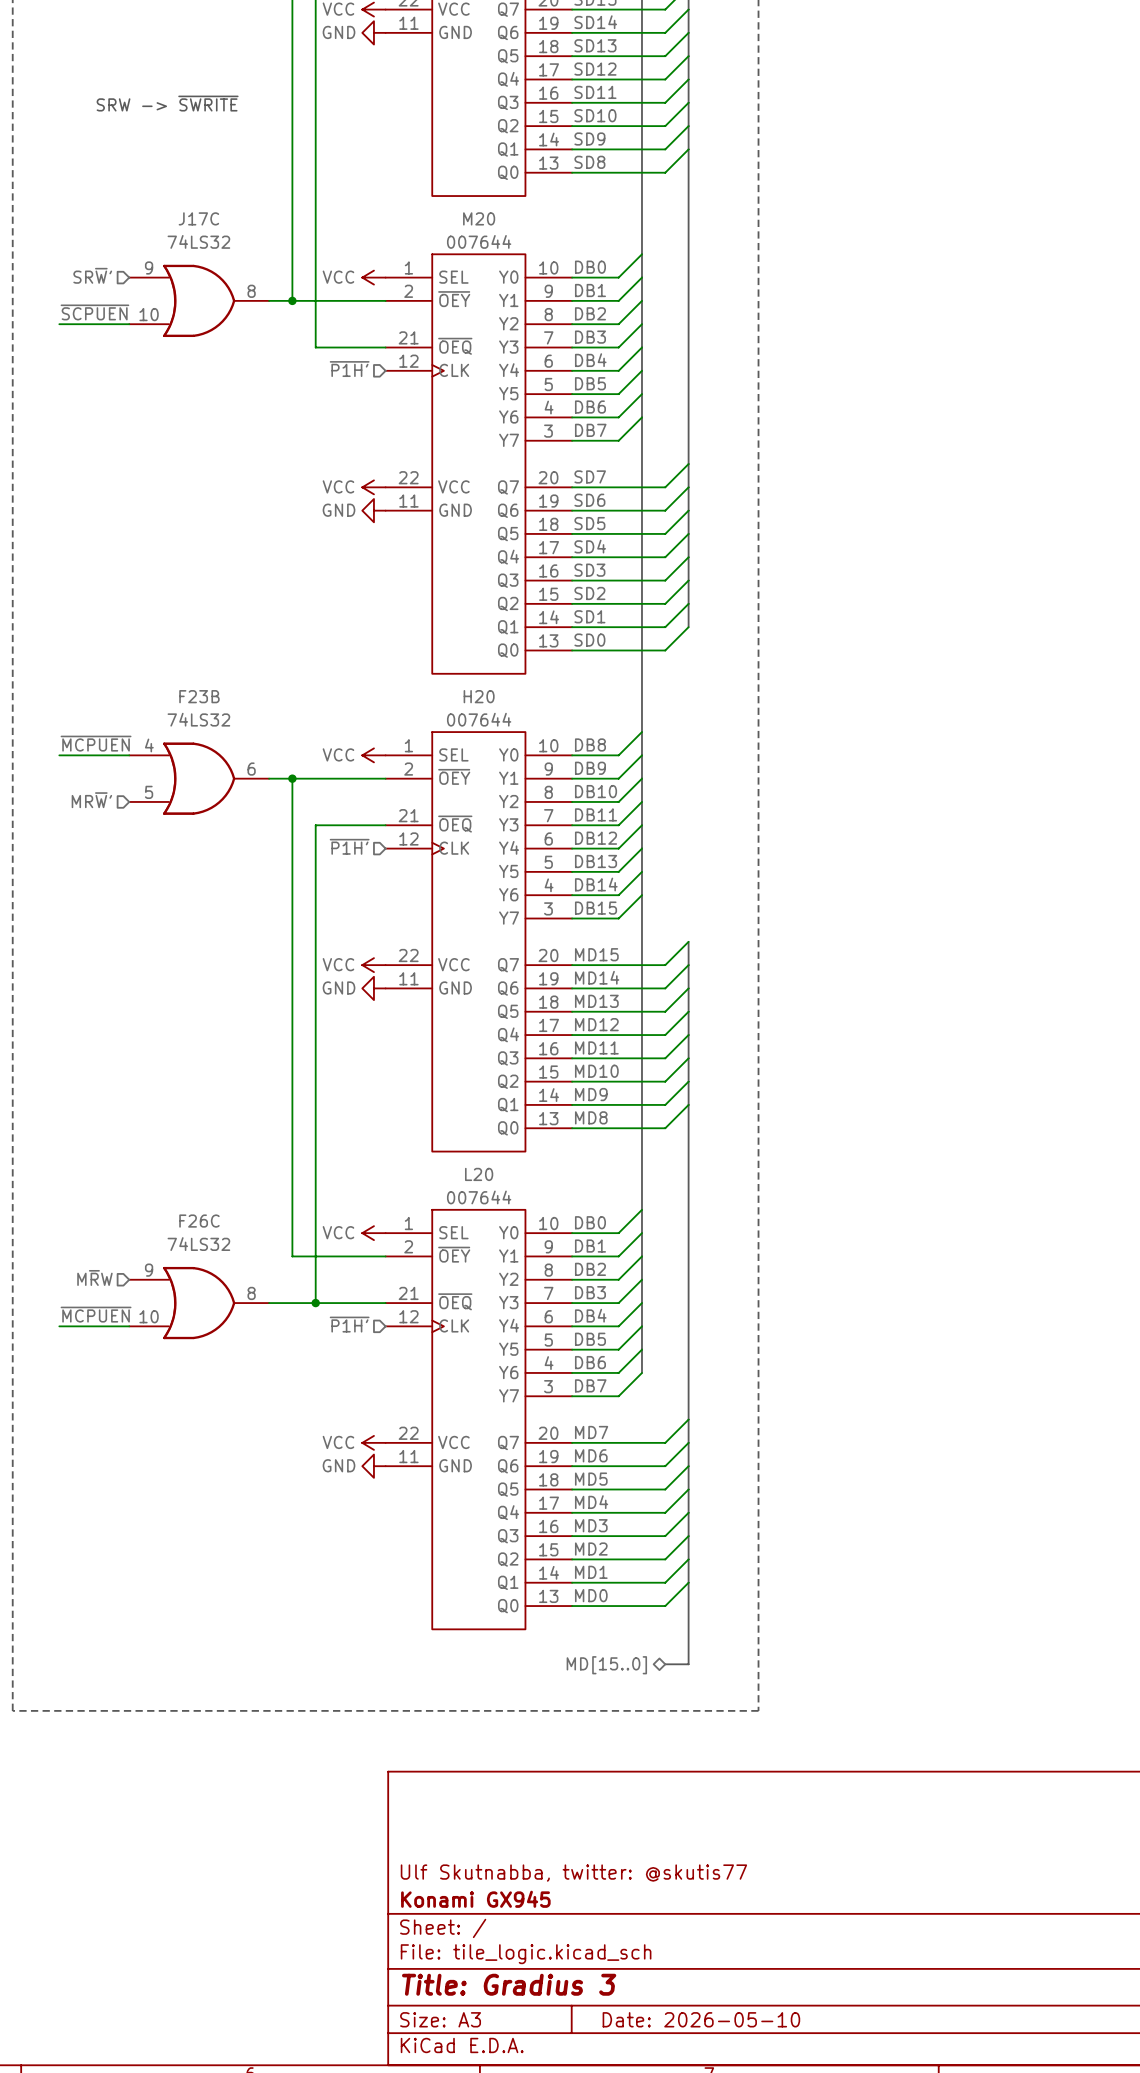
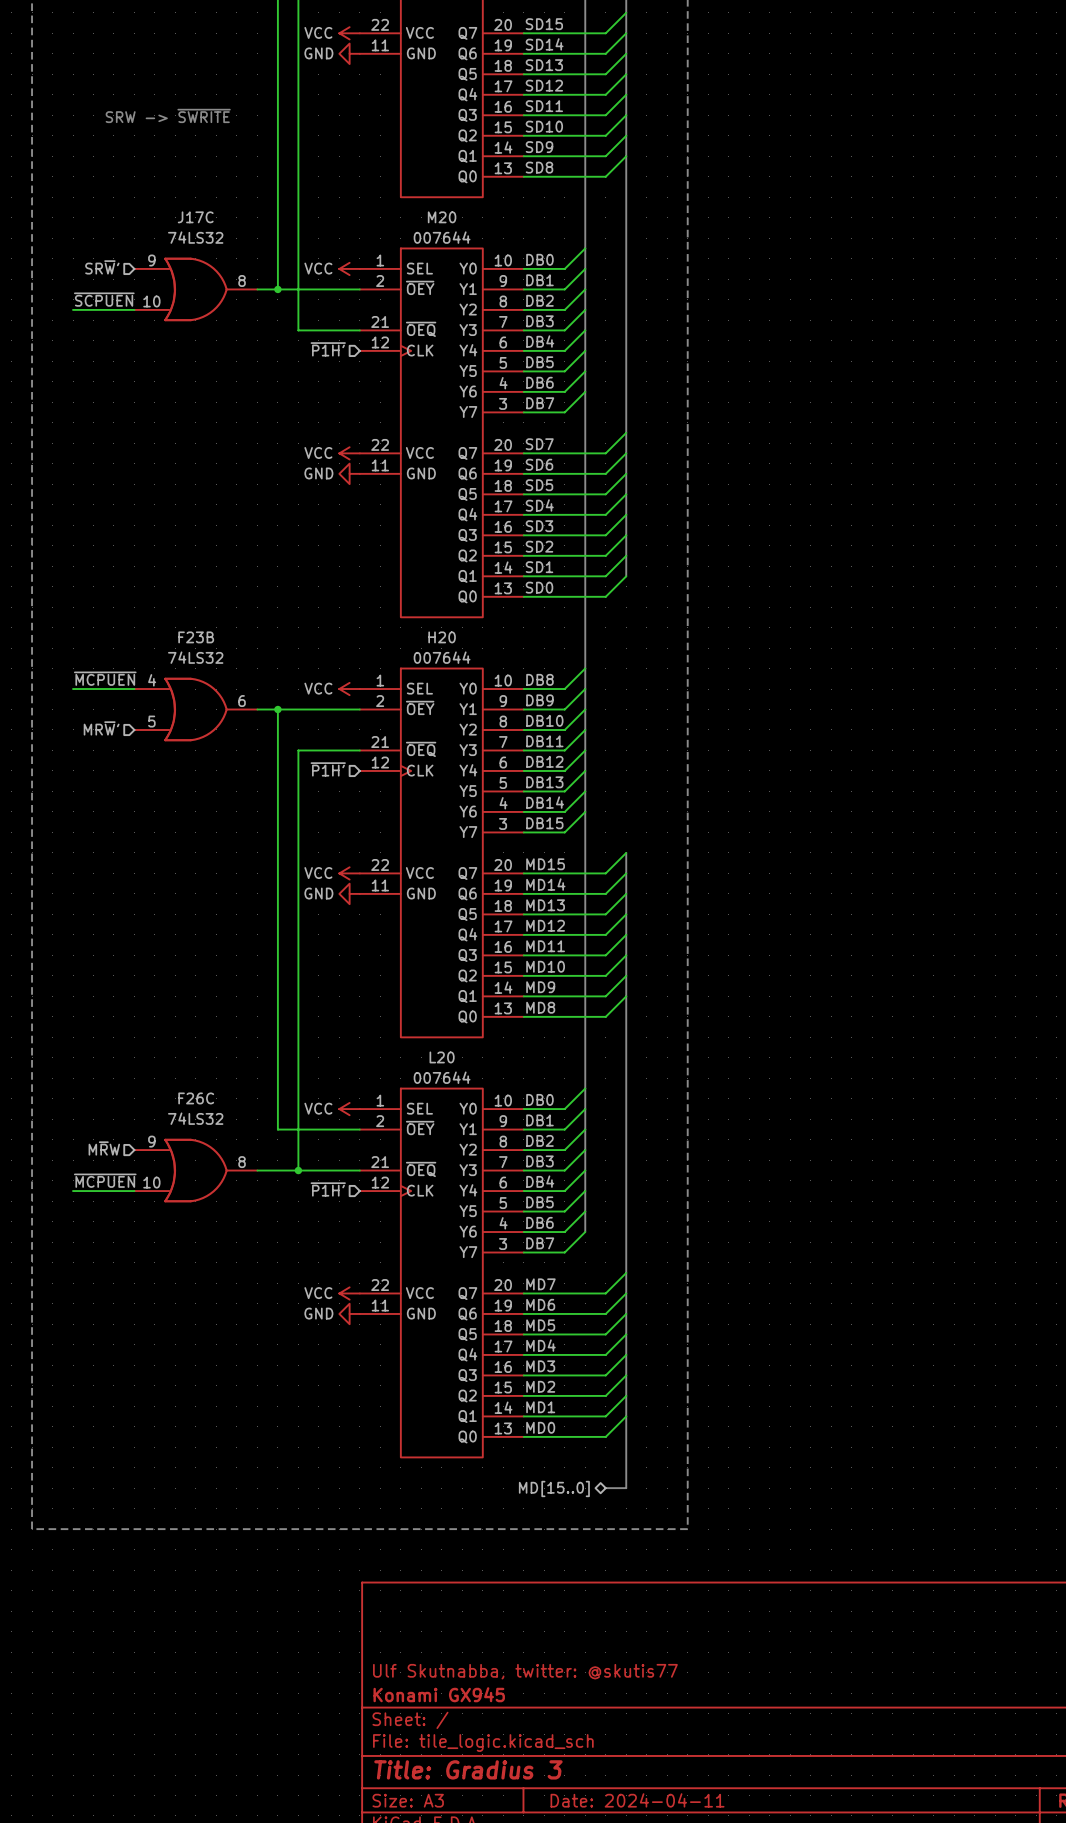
title block: Date: 2026-05-10 (701, 2019) -> Date: 2024-04-11 (637, 1800)

